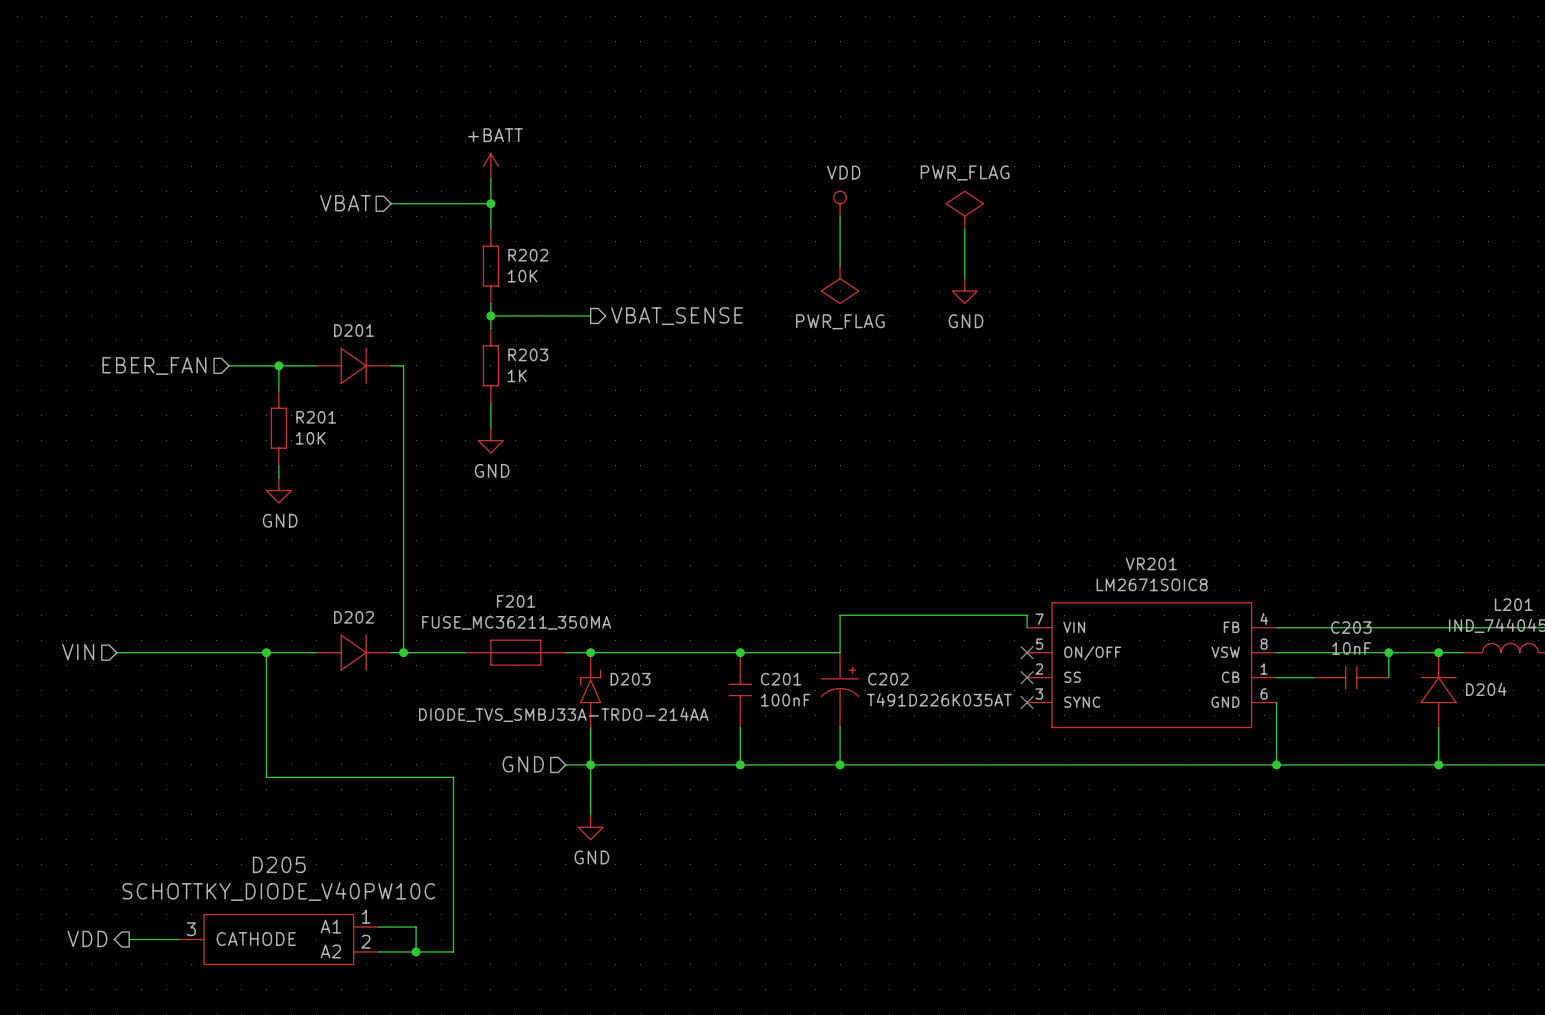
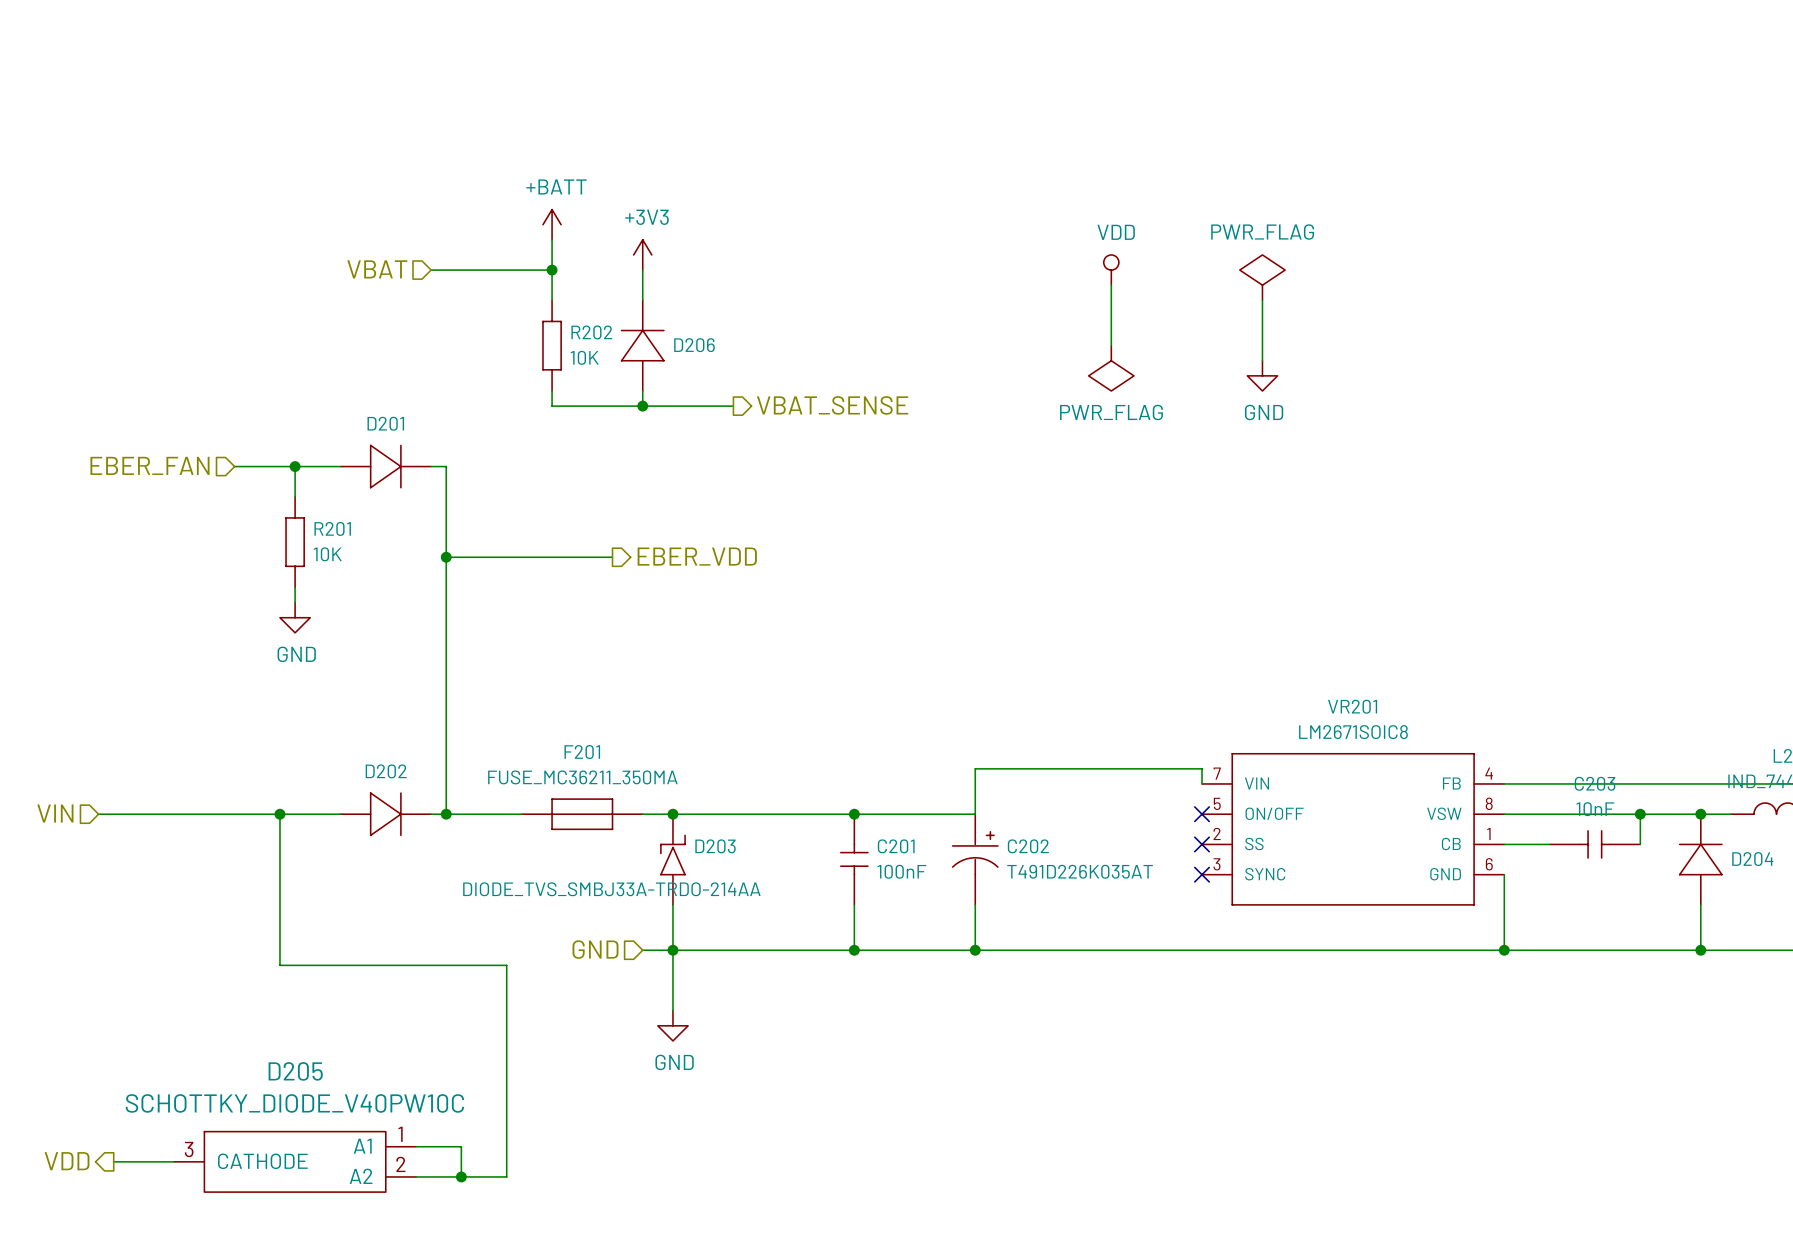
power symbol: none -> +3V3 (642, 254)
power symbol position: VDD (840, 203) -> VDD (1111, 270)
power symbol: PWR_FLAG (964, 209) -> none
power symbol: none -> PWR_FLAG (1262, 277)
wire: (840, 216) (840, 266) -> (1111, 285) (1111, 345)
wire: (964, 228) (964, 278) -> (1262, 300) (1262, 360)
D206: none -> (642, 345)
power symbol: PWR_FLAG (840, 284) -> none
power symbol: none -> PWR_FLAG (1111, 368)
power symbol position: GND (964, 291) -> GND (1262, 375)
wire: (490, 315) (490, 328) -> (642, 390) (642, 406)
junction: (490, 315) -> none
junction: none -> (642, 406)
wire: none -> (672, 406) (733, 406)
hierarchical label position: VBAT_SENSE (676, 316) -> VBAT_SENSE (832, 405)
R203: 1K (490, 365) -> none
wire: (490, 403) (490, 428) -> (642, 270) (642, 300)
wire: none -> (446, 557) (612, 557)
junction: none -> (446, 557)
power symbol: GND (490, 440) -> none
hierarchical label: none -> EBER_VDD (697, 556)

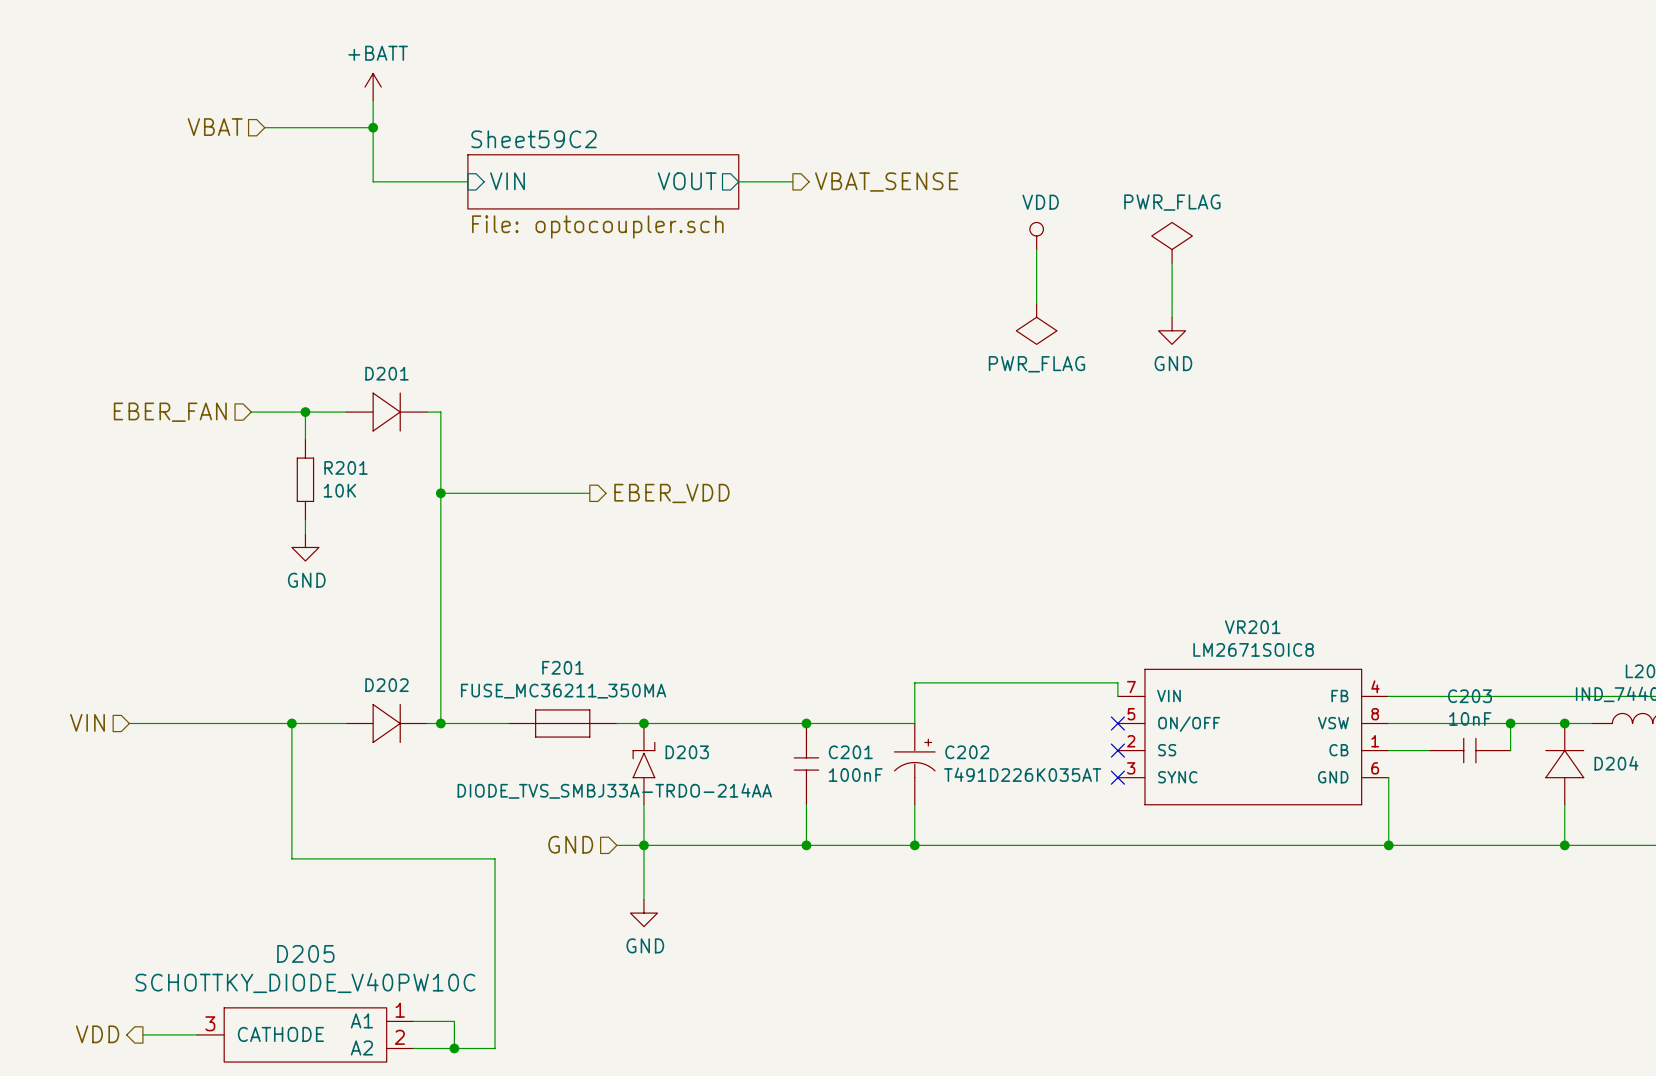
wire: none -> (373, 100) (373, 181) (467, 181)
junction: none -> (373, 127)
sheet pin: none -> VIN (507, 181)
sheet pin: none -> VOUT (687, 181)
sheet Sheet59C2: none -> File: optocoupler.sch (603, 181)
wire: none -> (738, 181) (792, 181)
power symbol position: +BATT (552, 224) -> +BATT (373, 87)
wire: (552, 239) (552, 300) -> none
power symbol: +3V3 (642, 254) -> none
hierarchical label position: VBAT (377, 269) -> VBAT (215, 127)
wire: (431, 270) (552, 270) -> (264, 127) (373, 127)
junction: (552, 270) -> none
wire: (642, 270) (642, 300) -> none
R202: 10K (552, 345) -> none
D206: (642, 345) -> none
wire: (552, 390) (552, 406) (733, 406) -> none
wire: (642, 390) (642, 406) -> none
hierarchical label position: VBAT_SENSE (832, 405) -> VBAT_SENSE (886, 182)
junction: (642, 406) -> none

